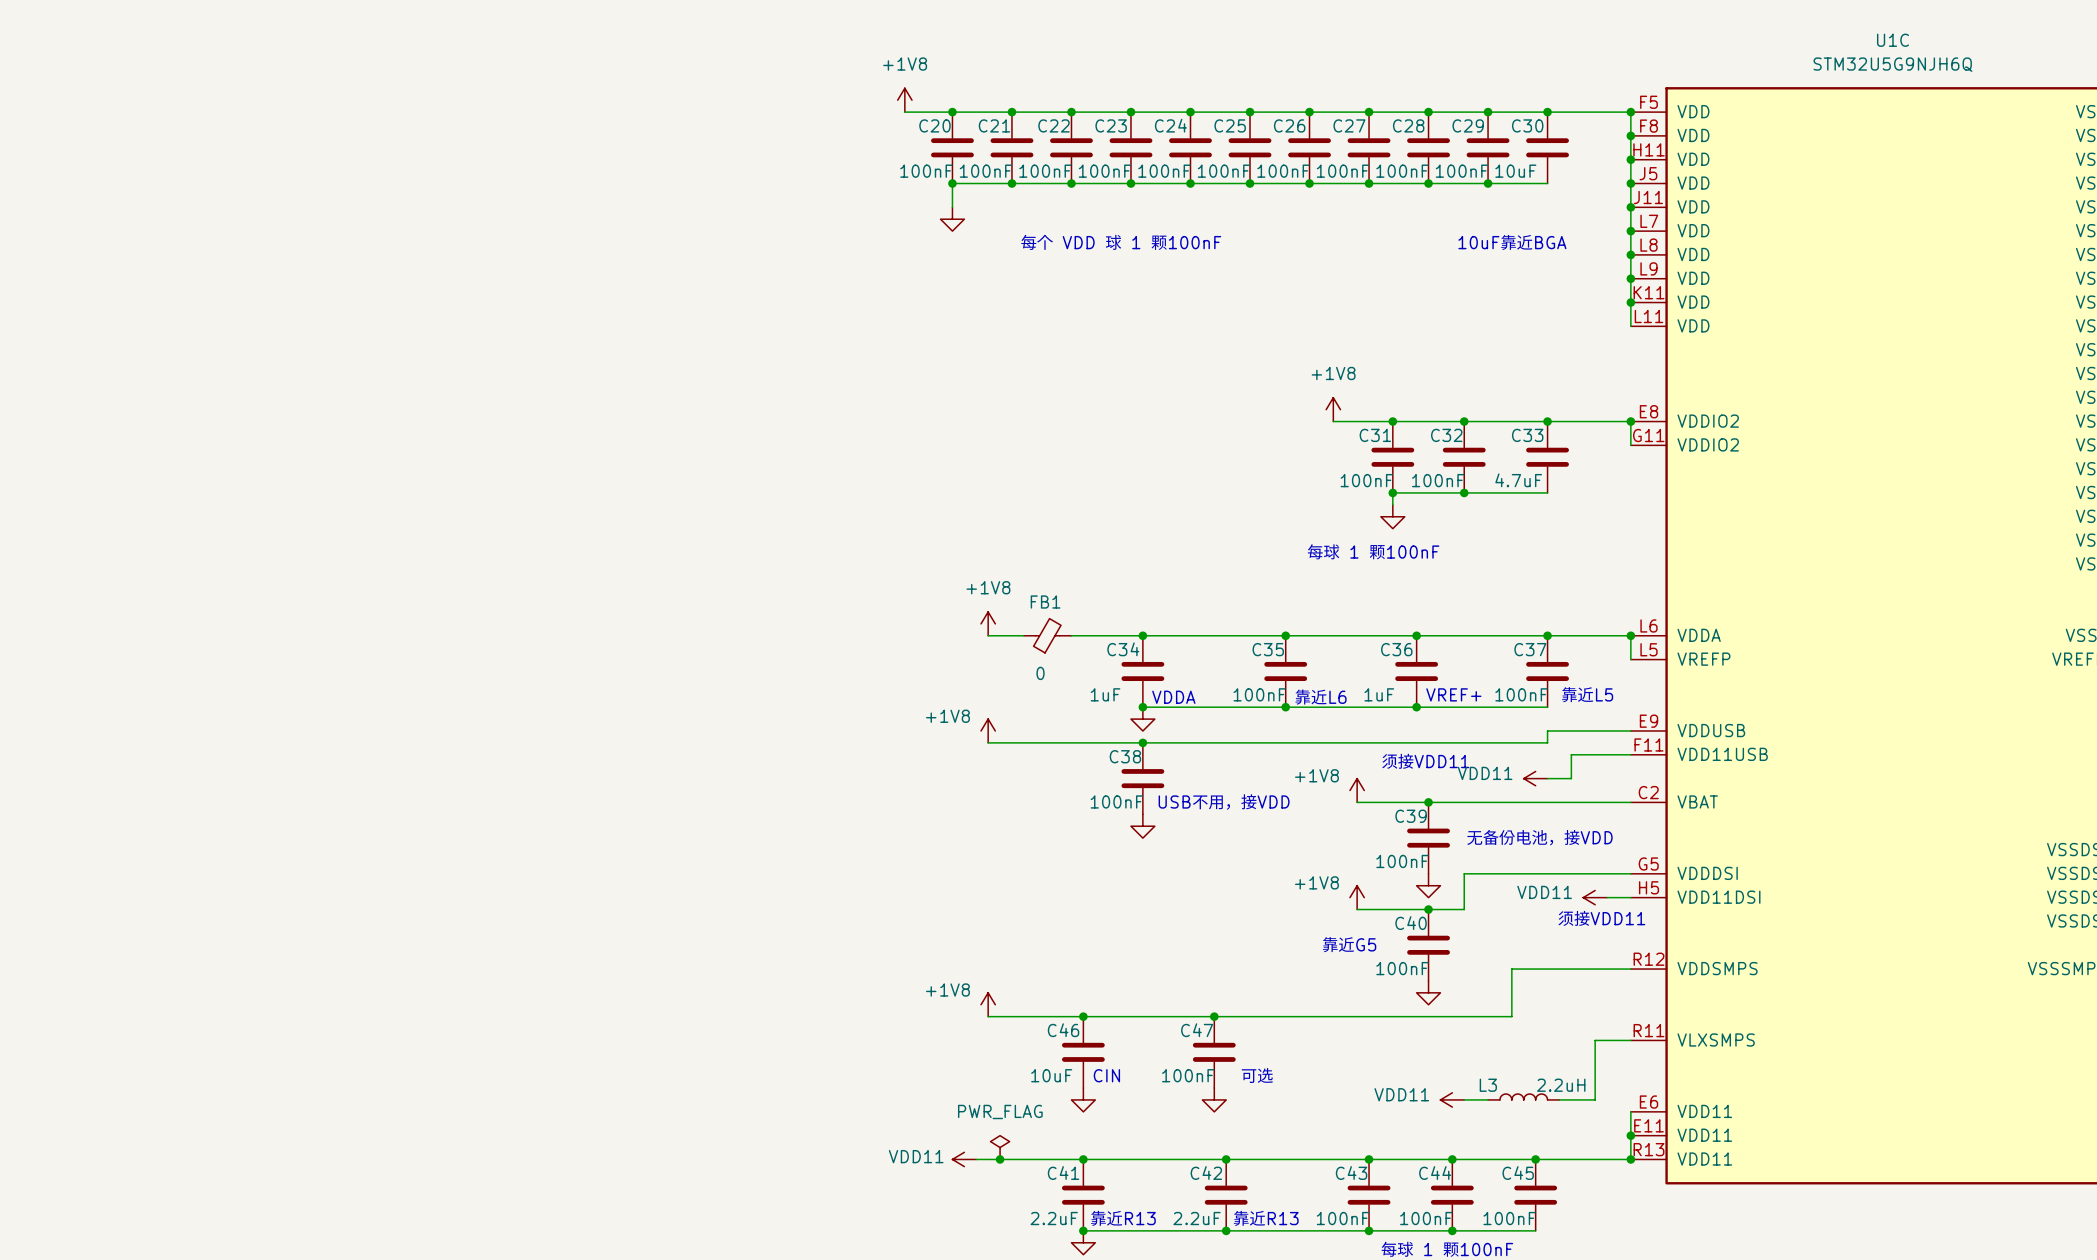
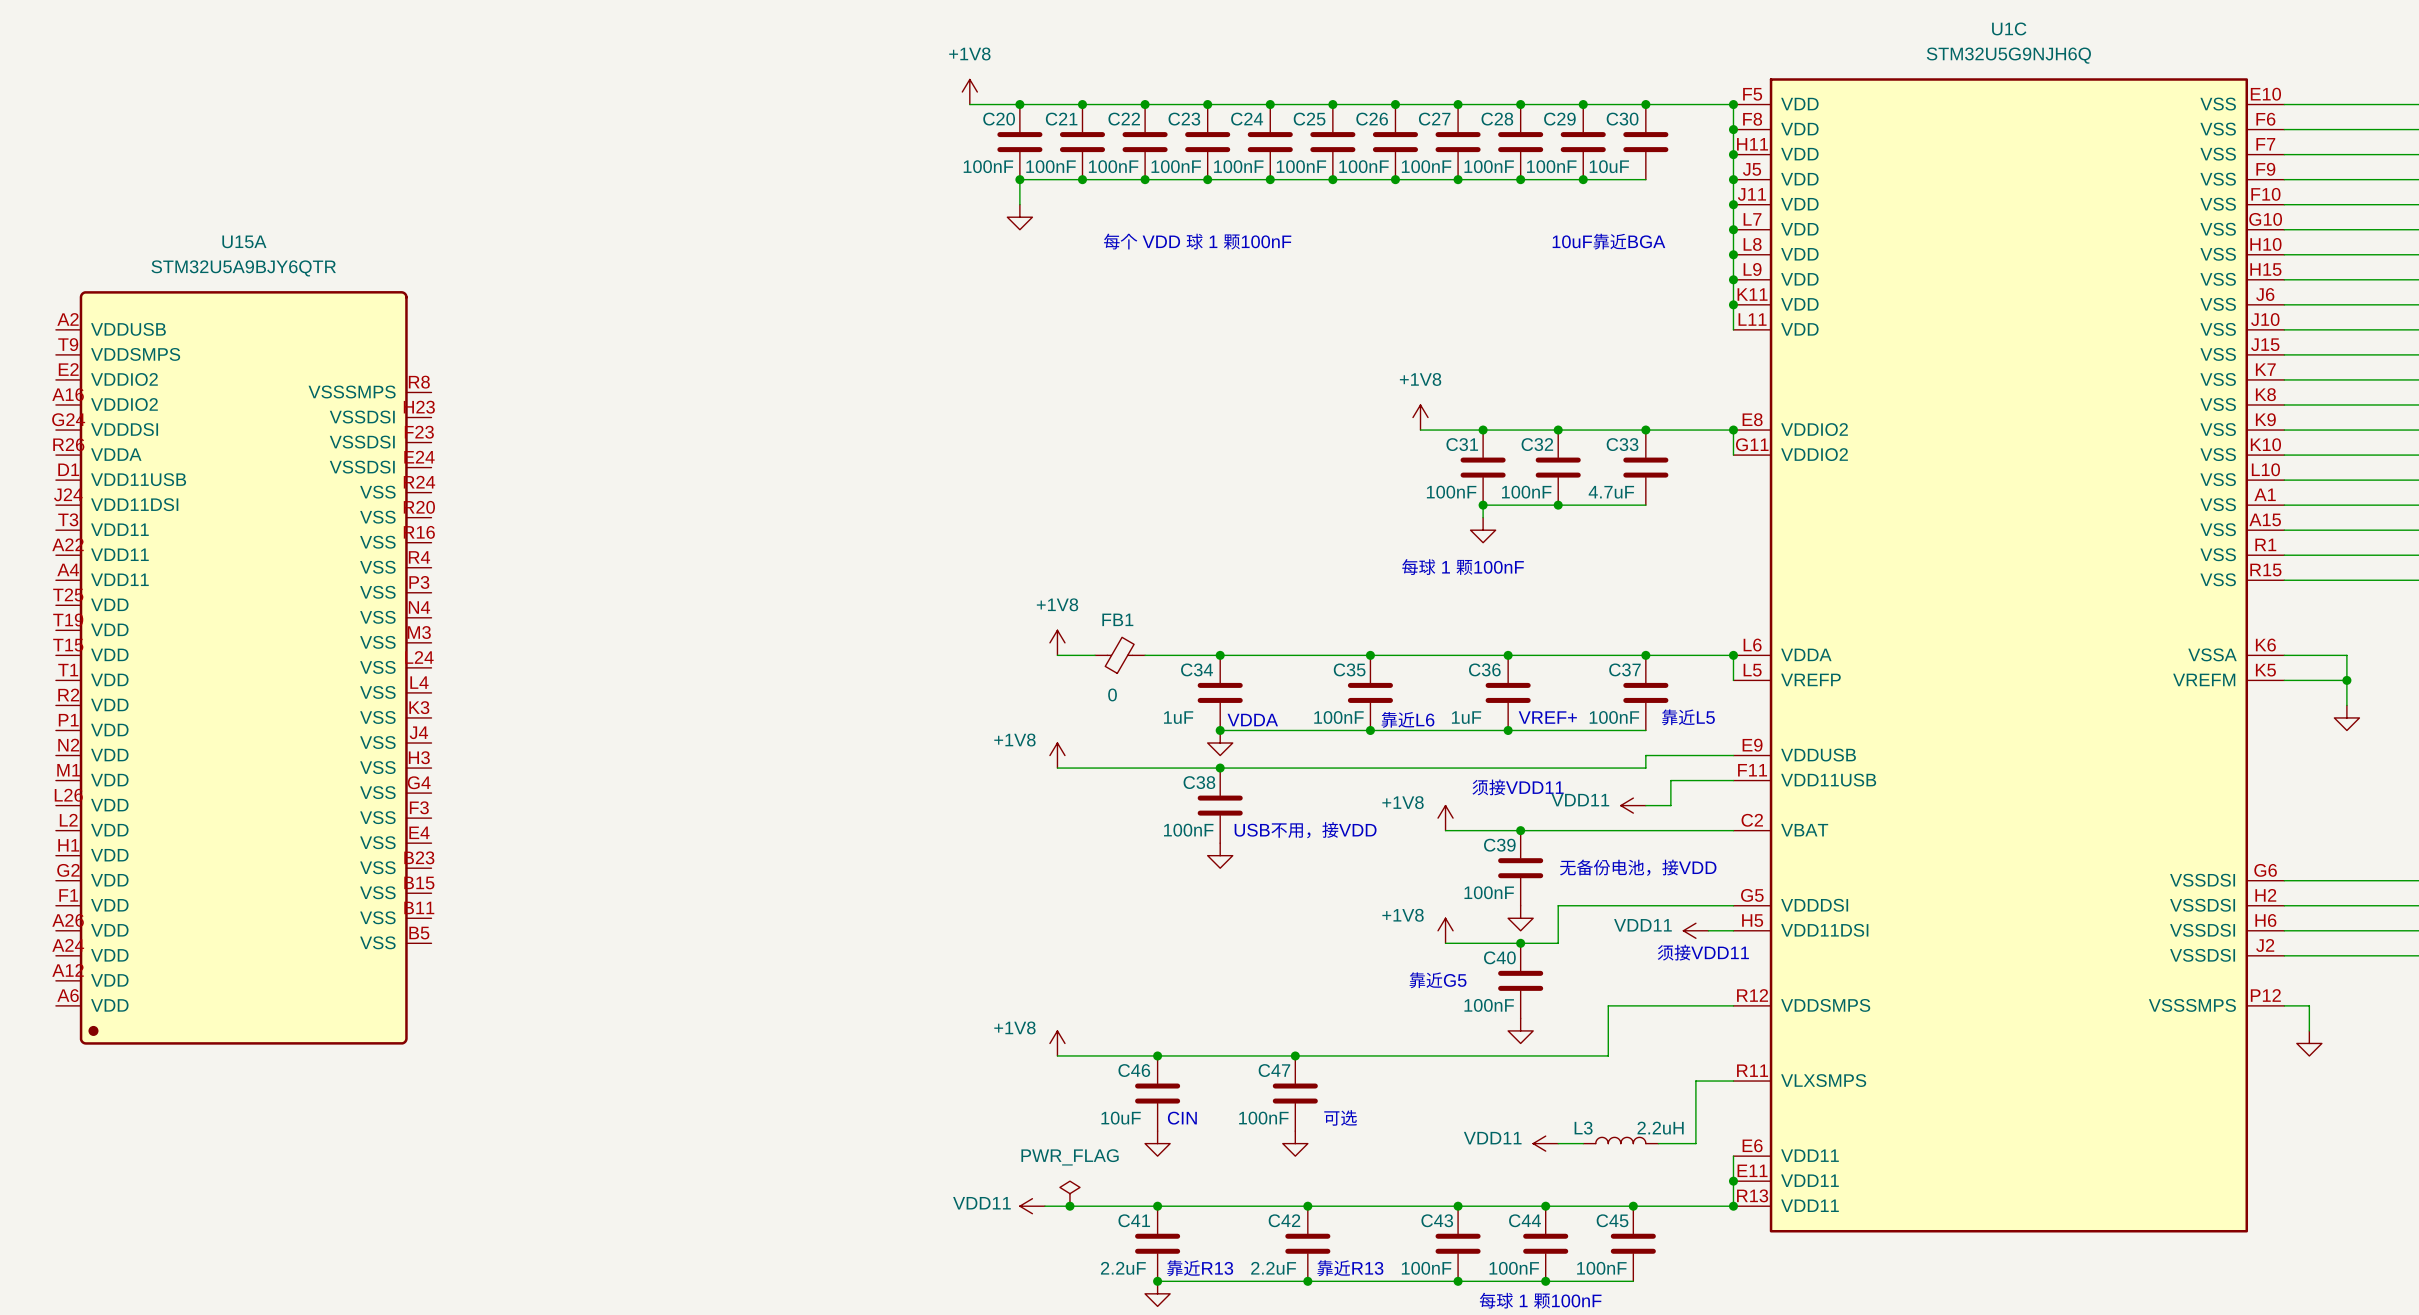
U15A: none -> STM32U5A9BJY6QTR (243, 667)

